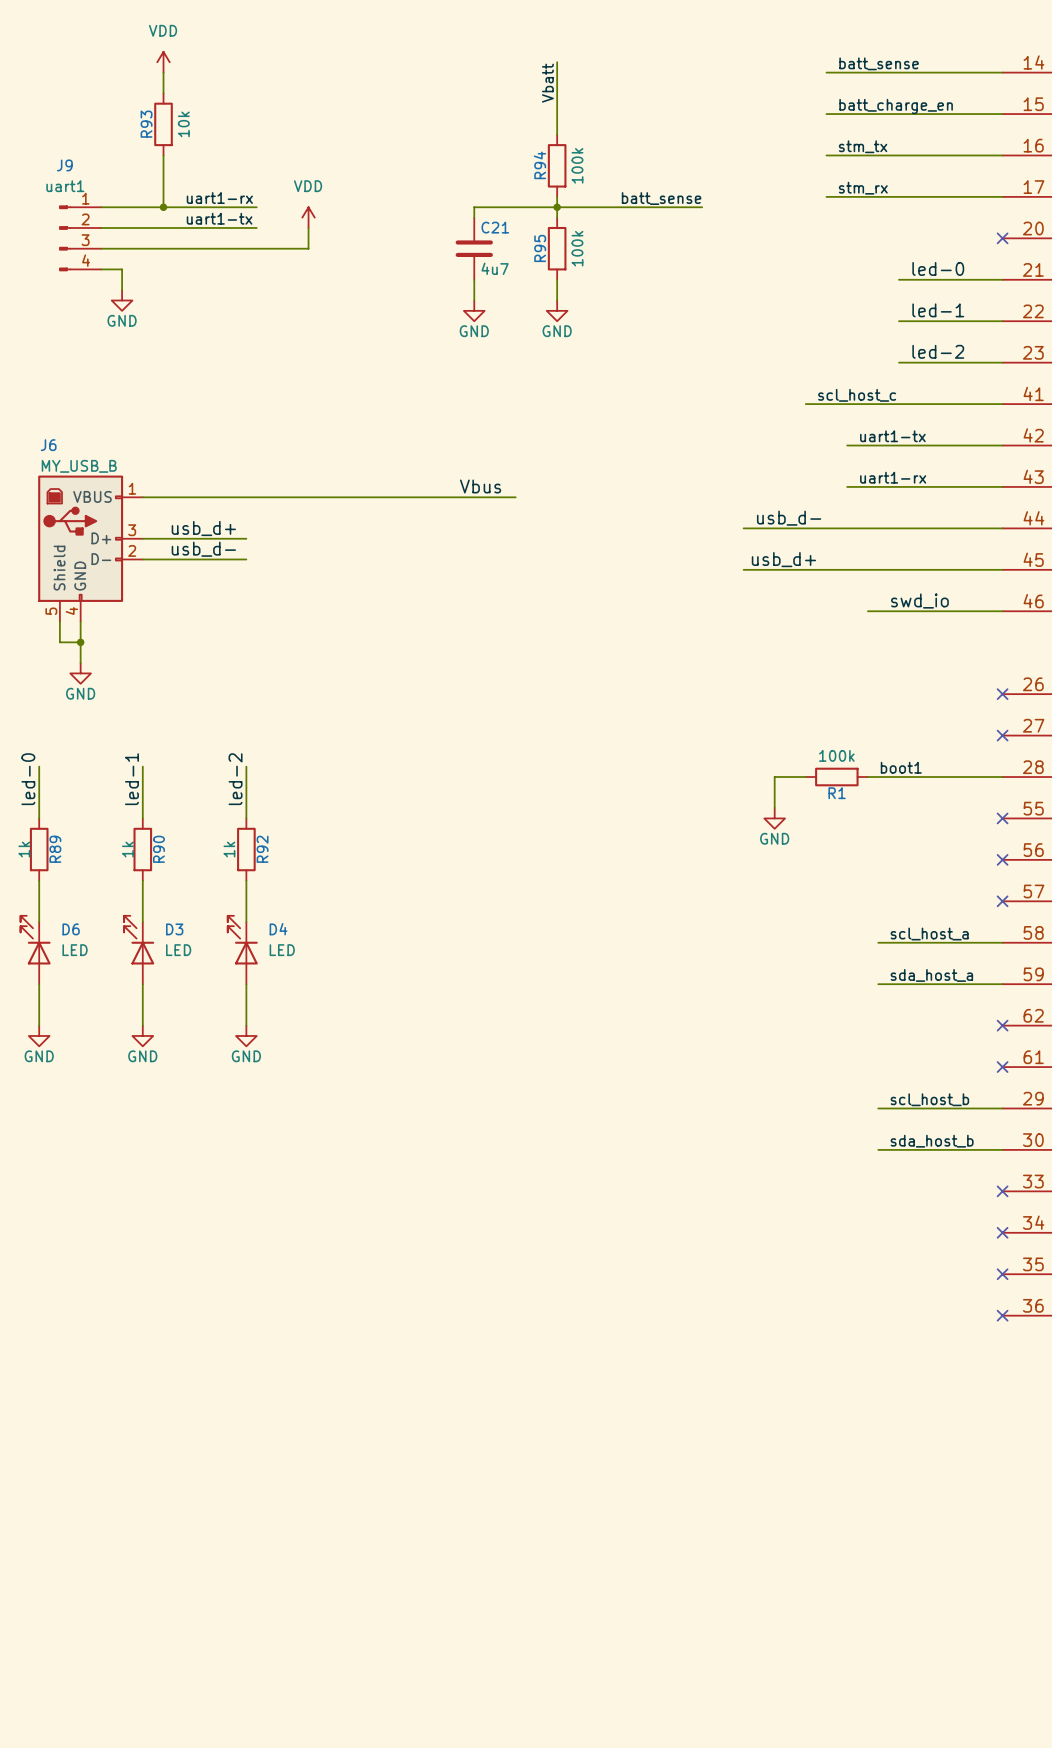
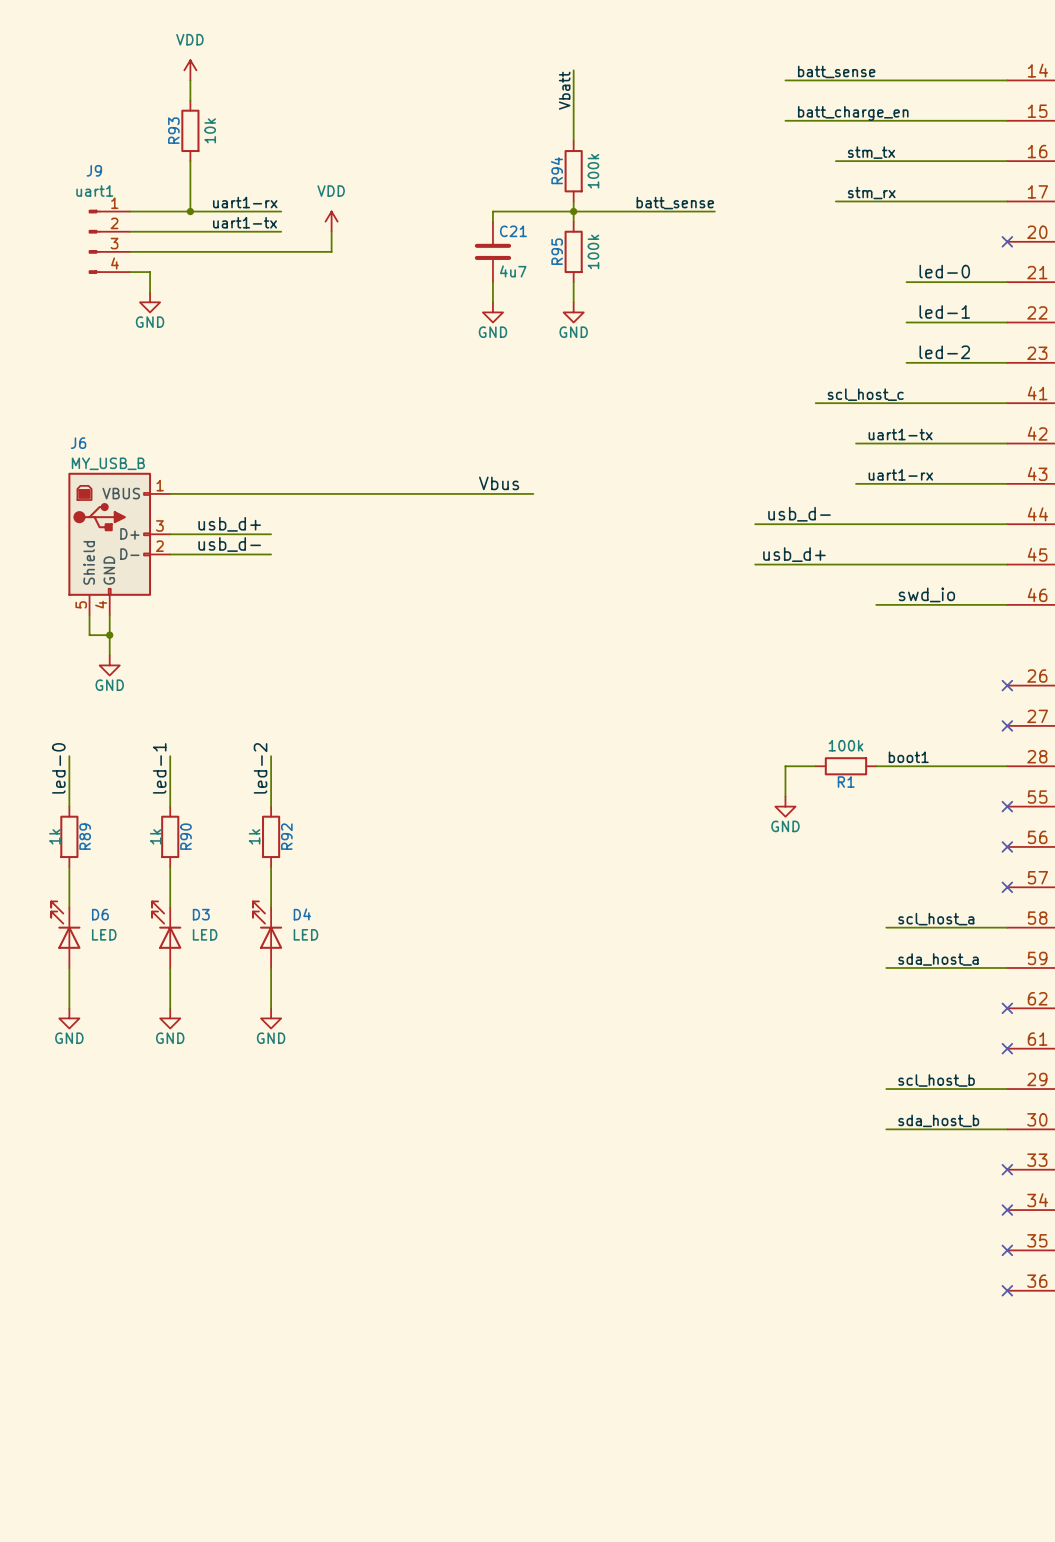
label position: batt_sense (879, 63) -> batt_sense (836, 71)
wire: none -> (785, 80) (835, 80)
label position: batt_charge_en (896, 106) -> batt_charge_en (853, 113)
wire: none -> (785, 120) (835, 120)

